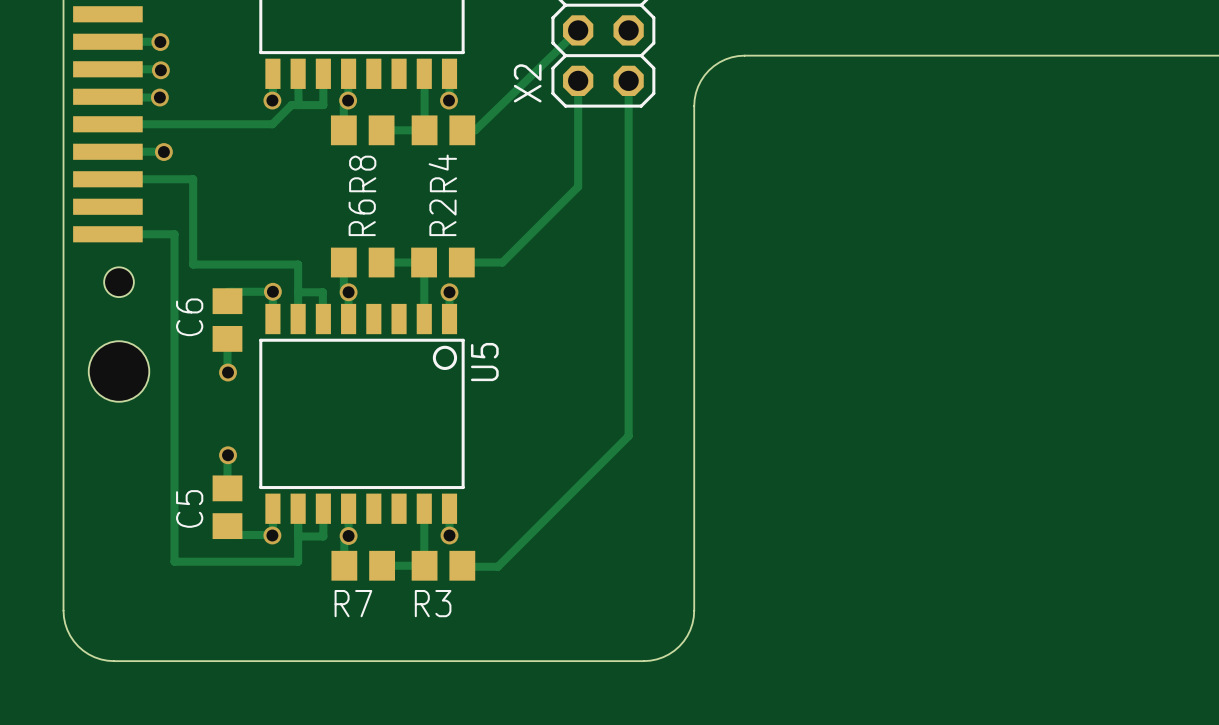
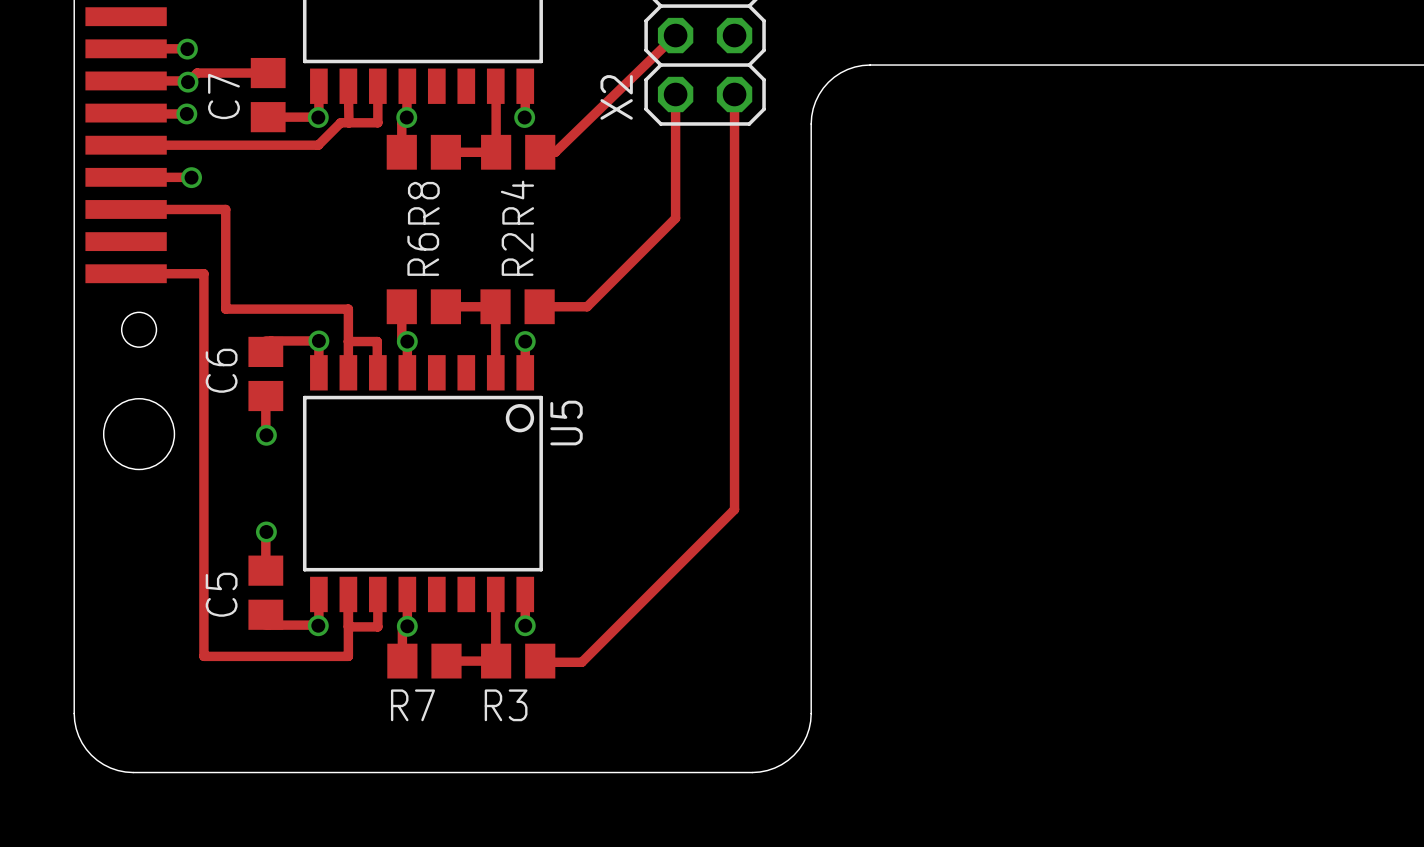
track: none -> (268, 73) (197, 73) (188, 82)
C7: none -> (268, 95)
track: none -> (268, 117) (318, 117)

